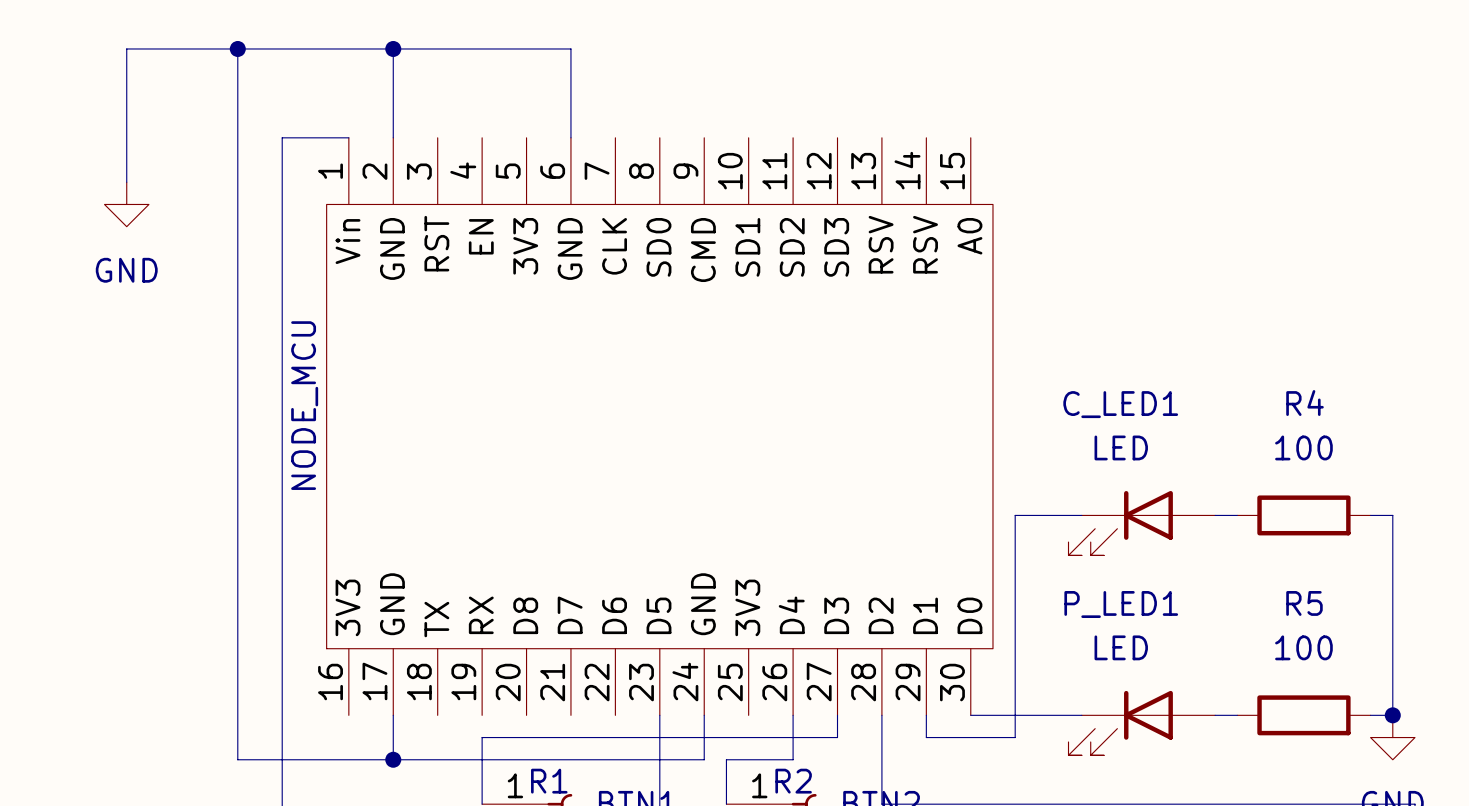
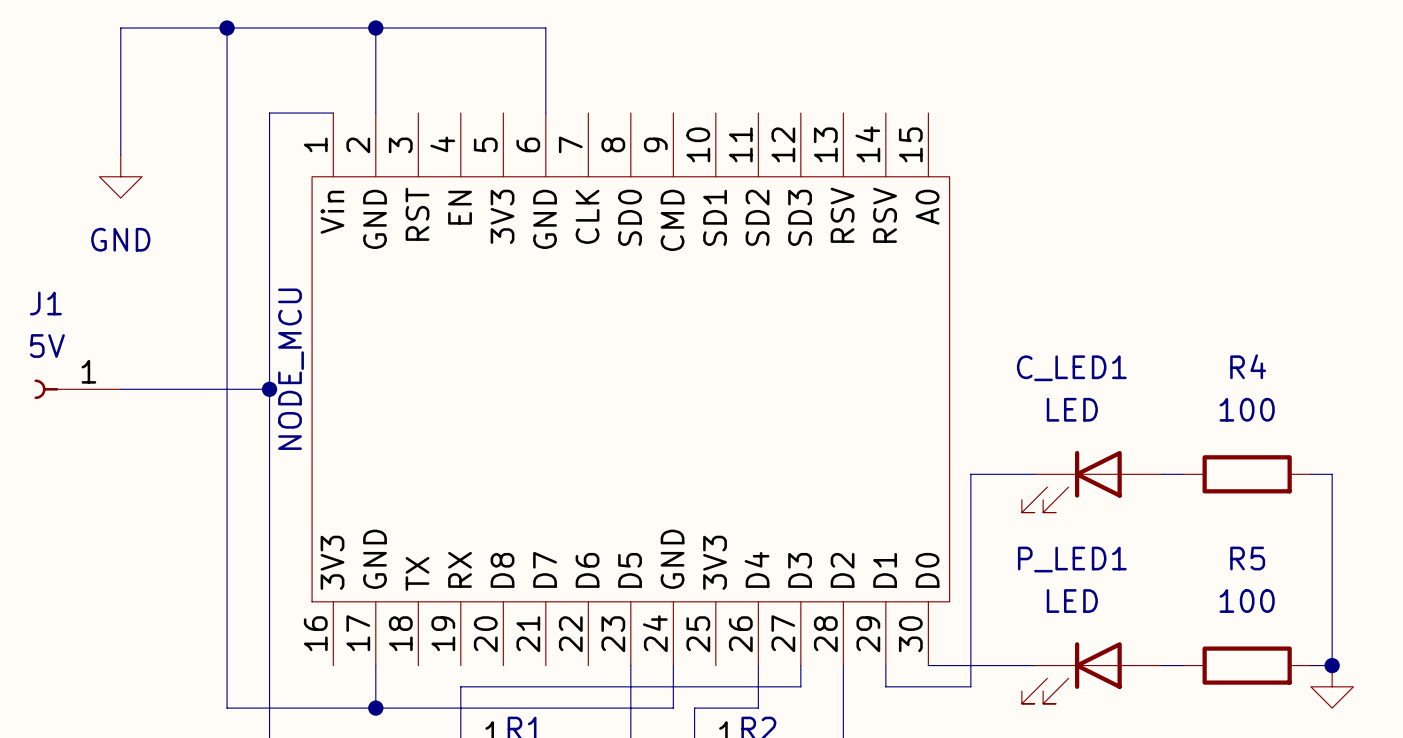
J1: none -> 5V (77, 389)
wire: none -> (120, 389) (269, 389)
junction: none -> (269, 389)

